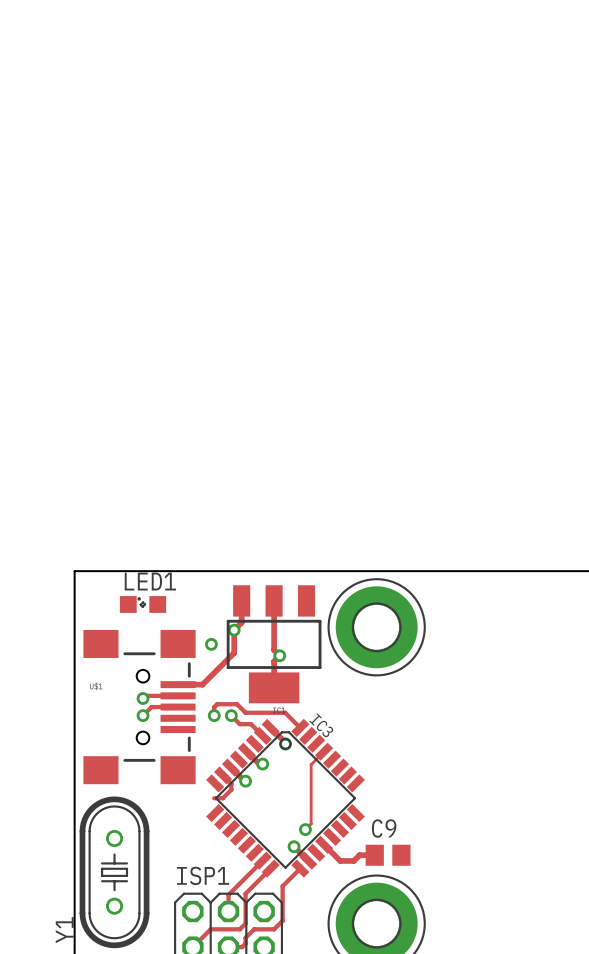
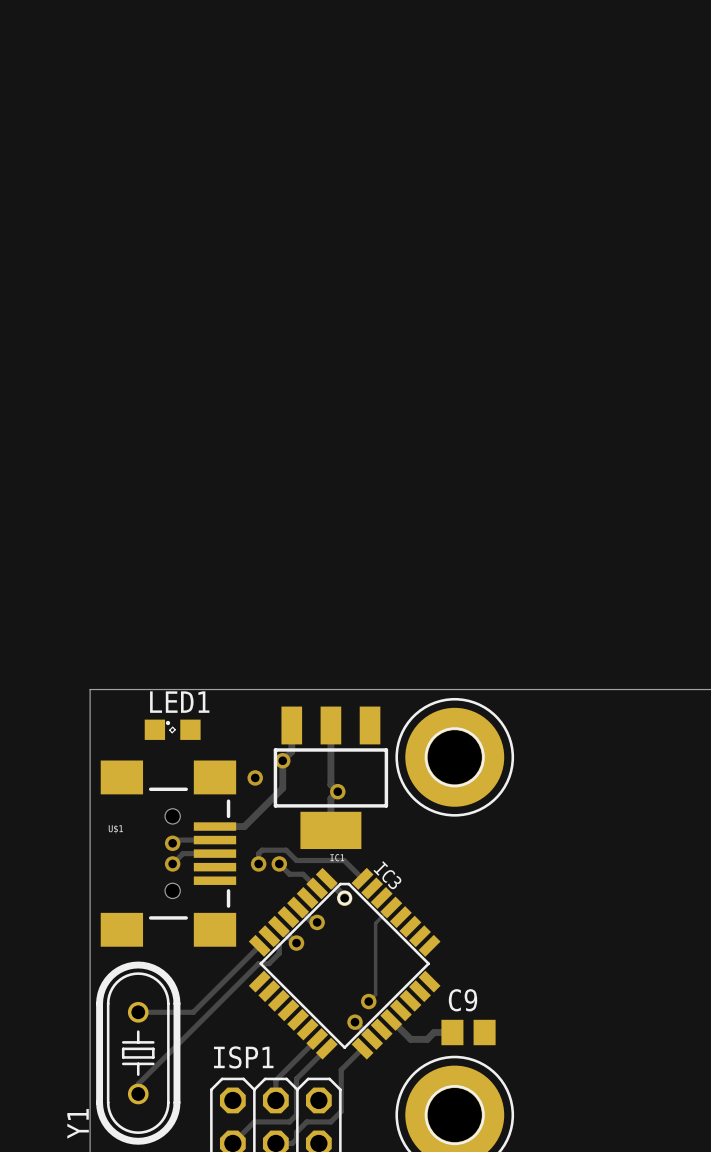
track: none -> (259, 945) (193, 1012) (138, 1012)
track: none -> (258, 963) (138, 1084) (138, 1093)

